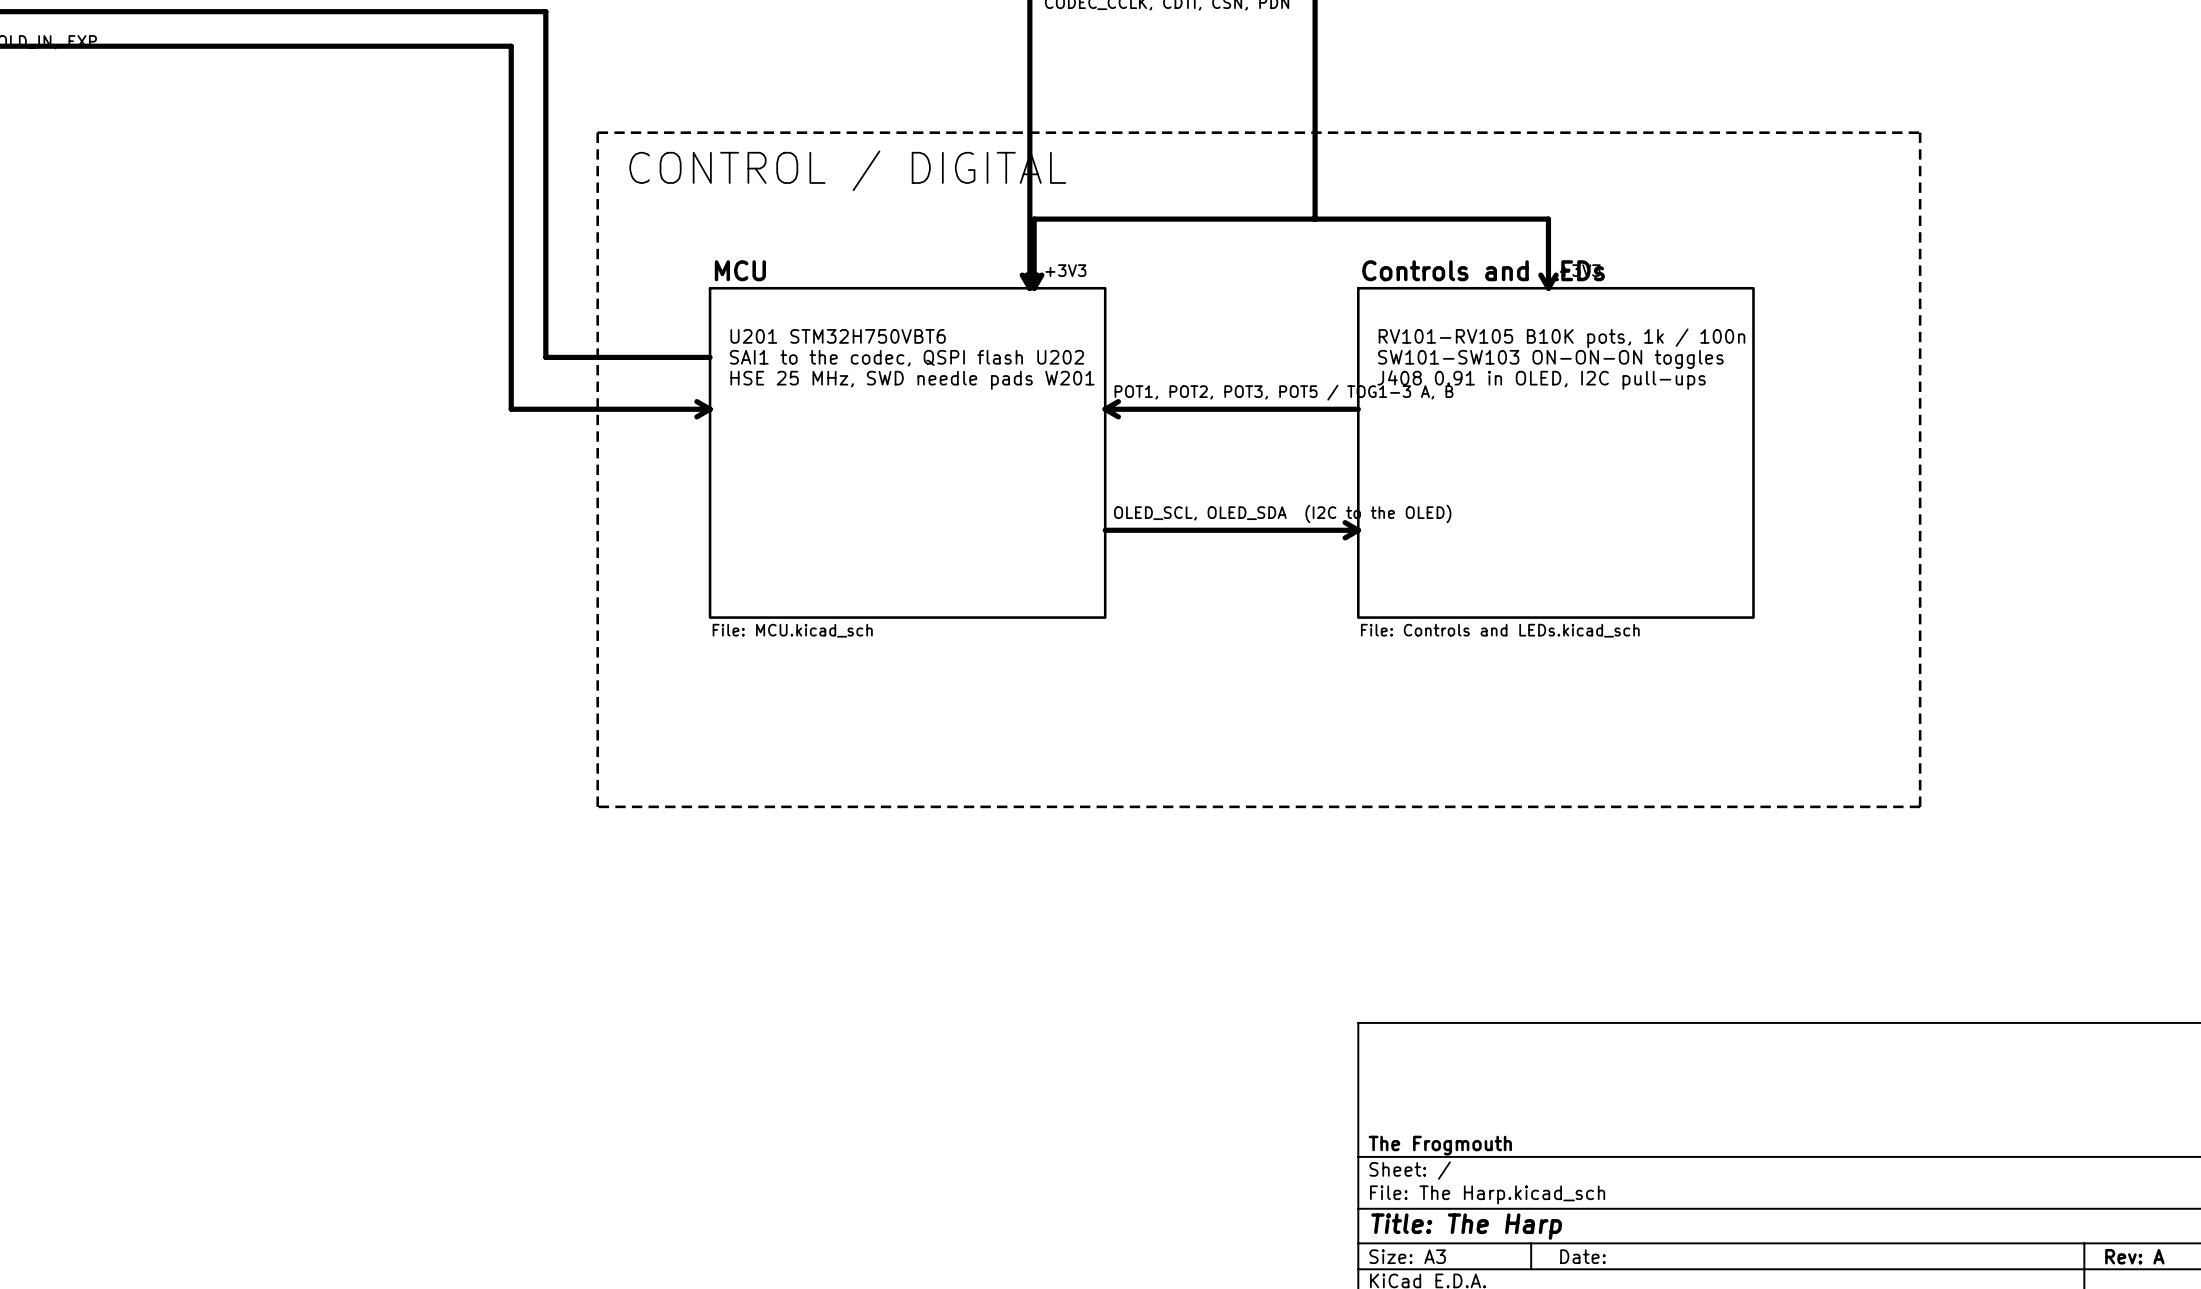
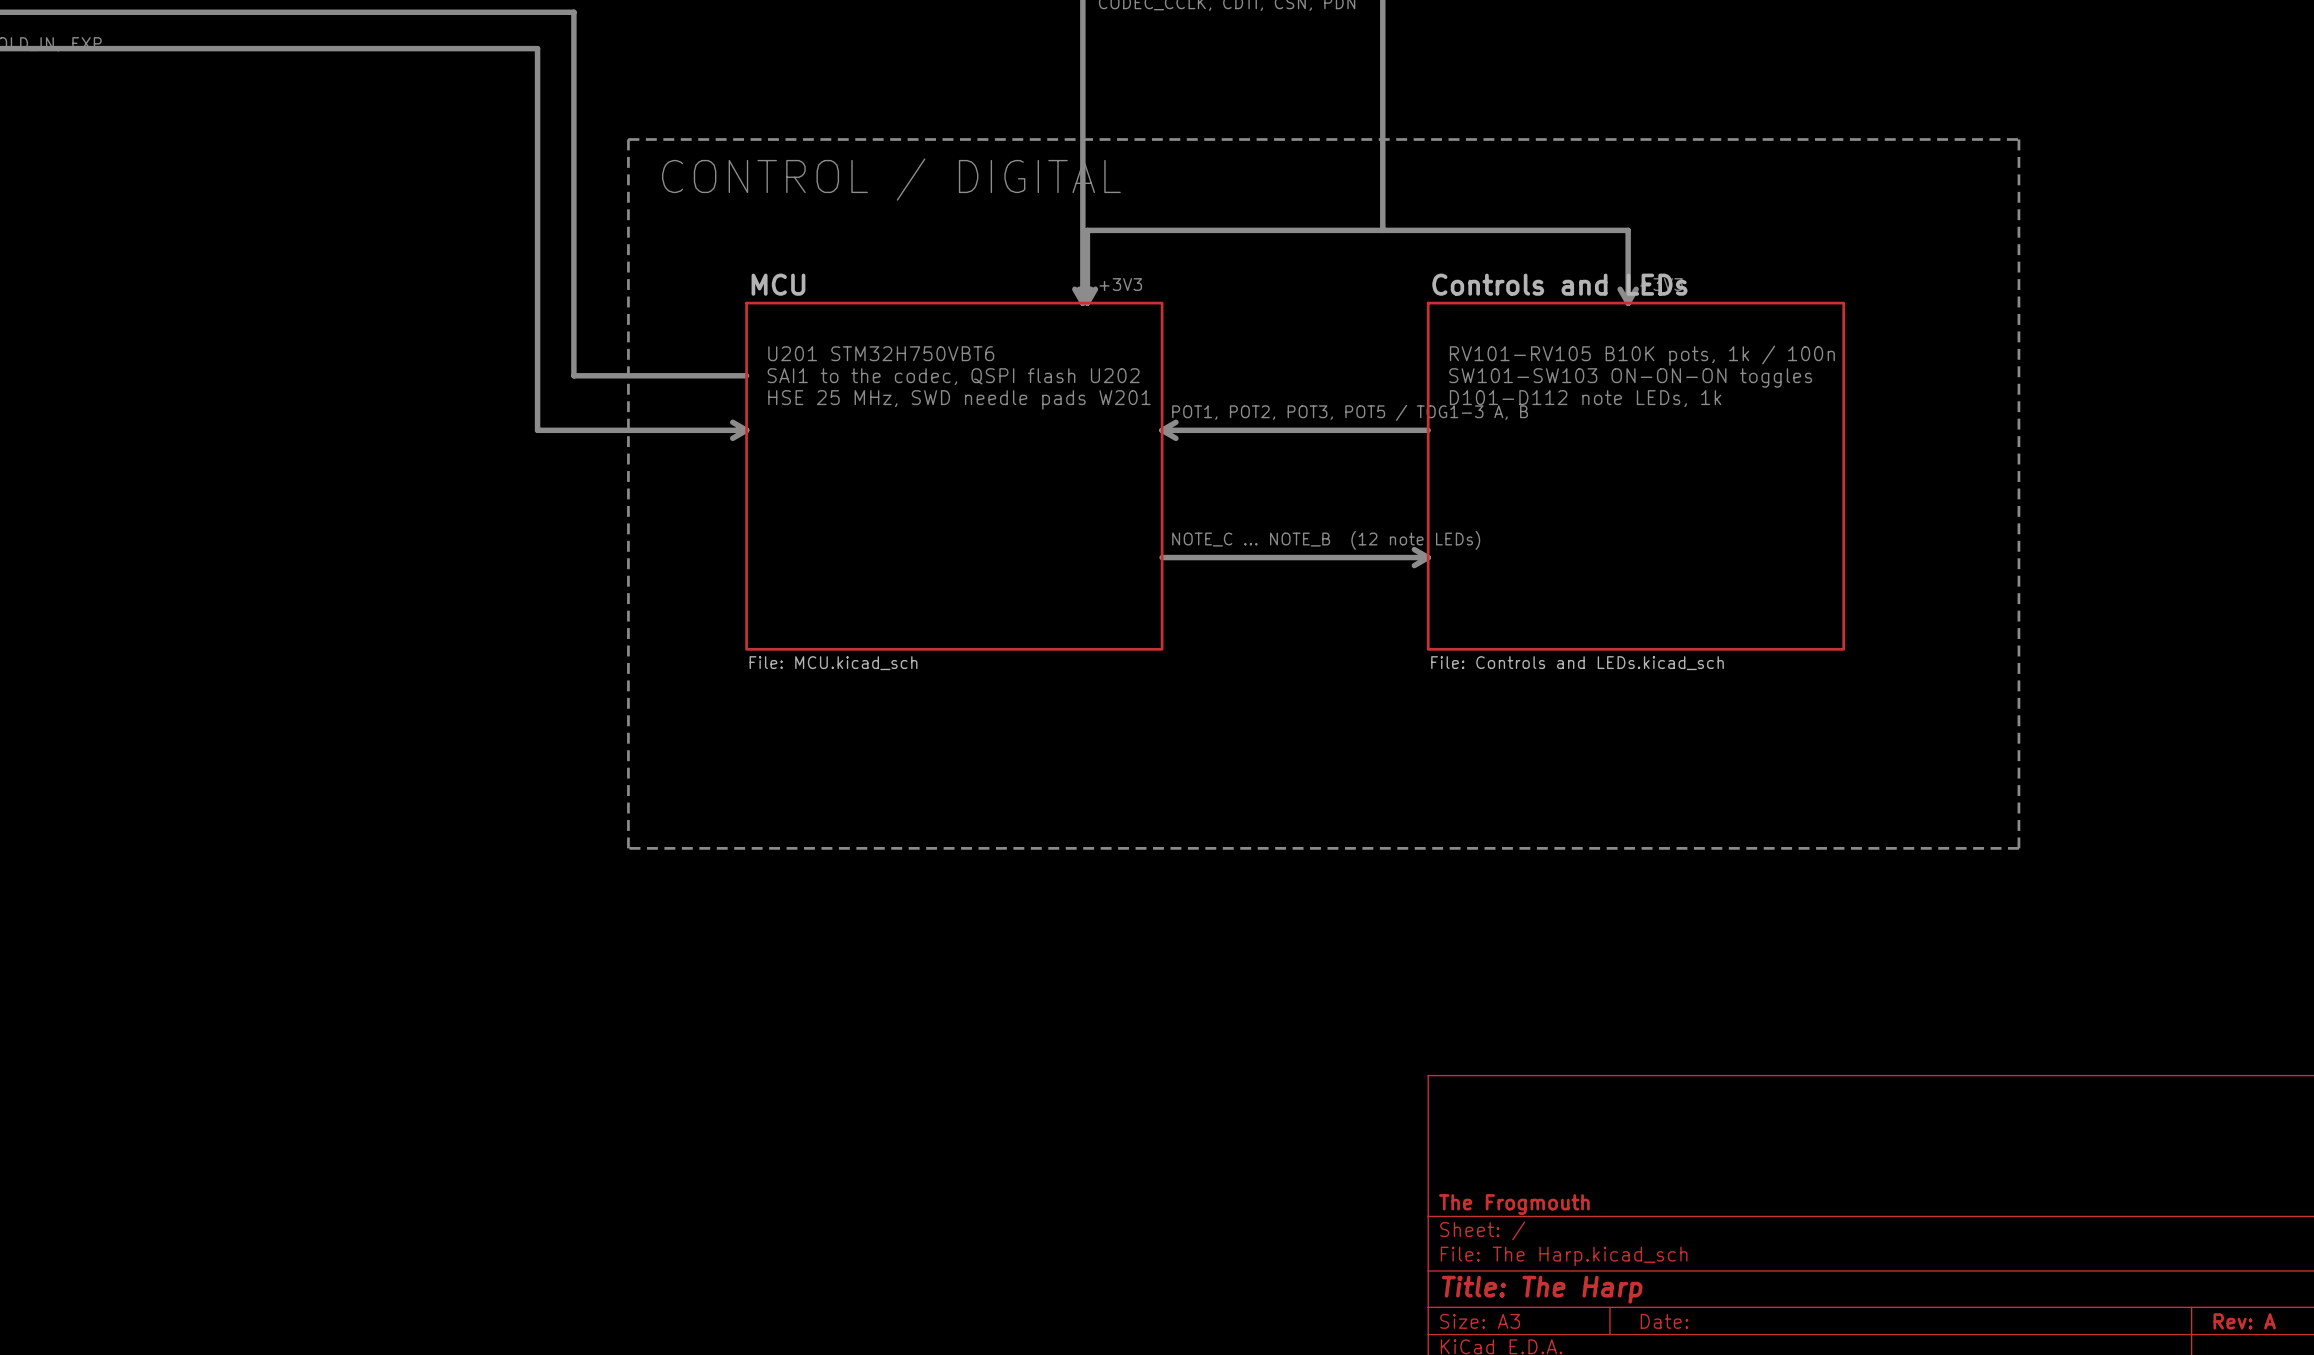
text: J408 0.91 in OLED, I2C pull-ups (1541, 380) -> D101-D112 note LEDs, 1k (1585, 398)
text: OLED_SCL, OLED_SDA (I2C to the OLED) (1282, 513) -> NOTE_C ... NOTE_B (12 note LEDs) (1326, 540)

